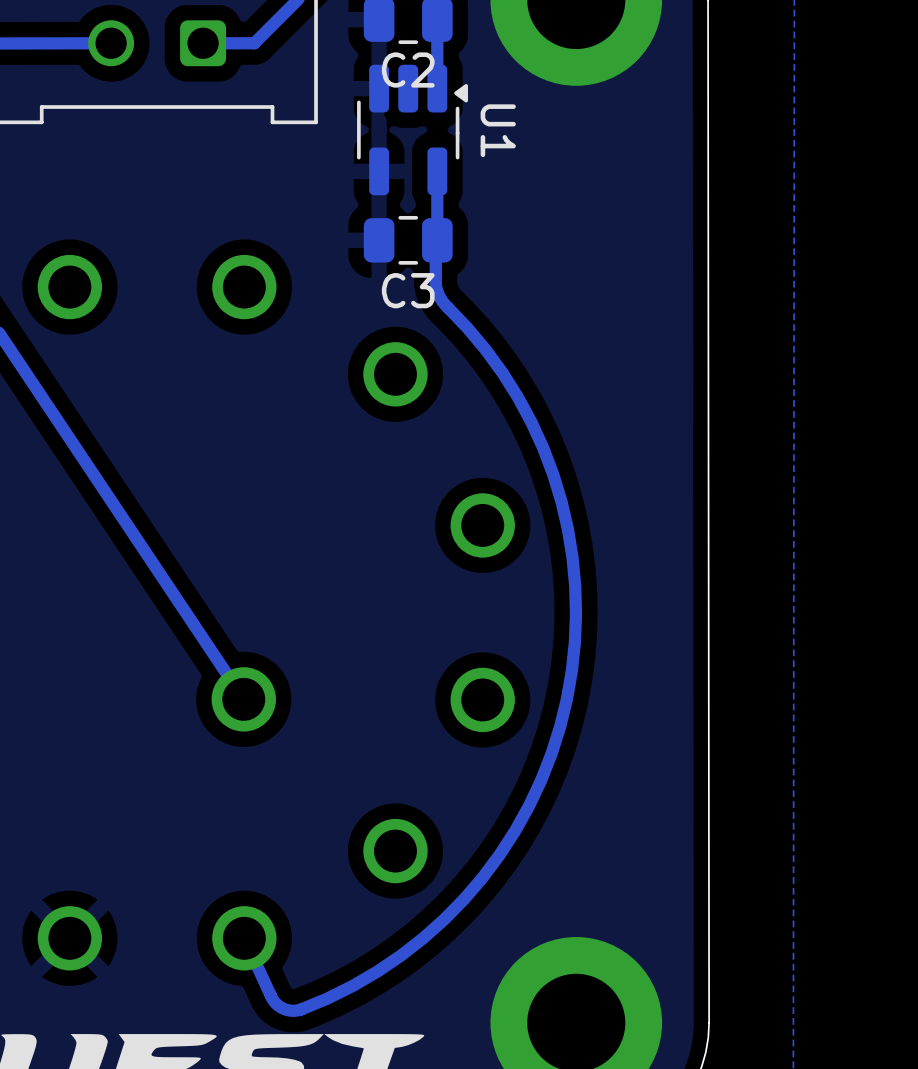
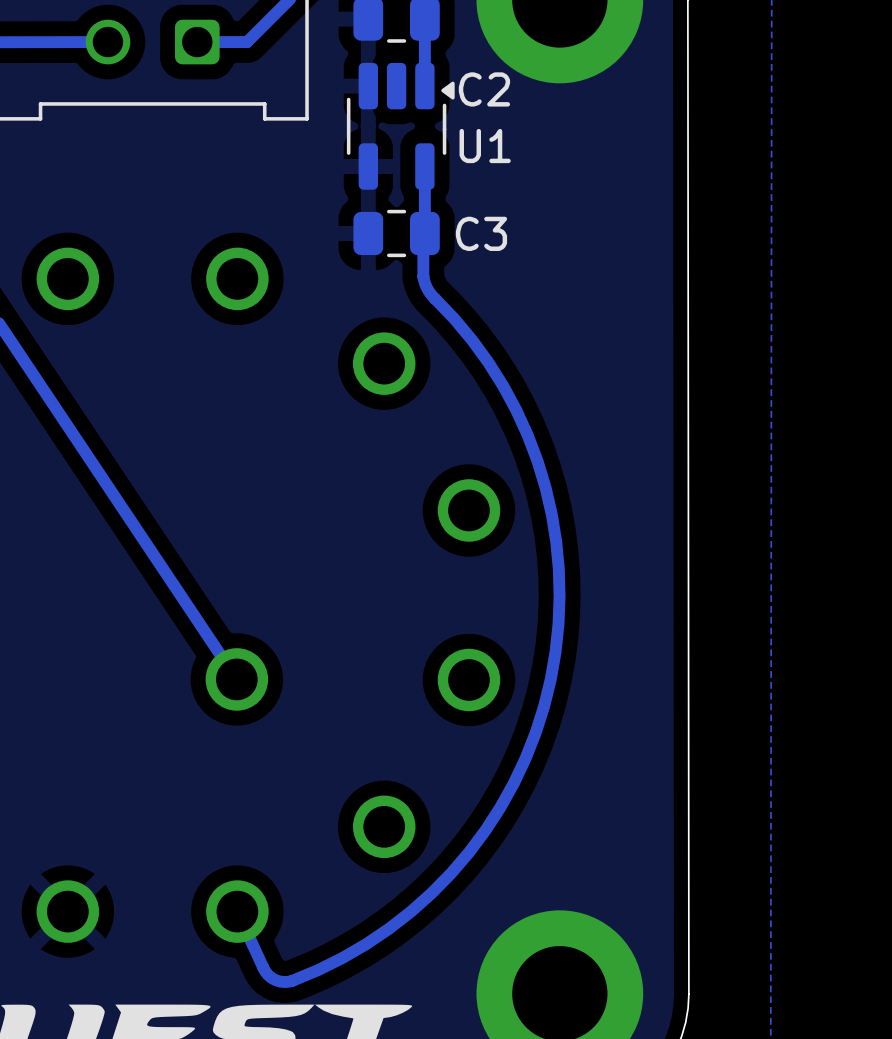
C2 name position: C2 (408, 70) -> C2 (484, 89)
U1 name rotation: 0° (498, 130) -> 90° counterclockwise (485, 146)
C3 name position: C3 (408, 290) -> C3 (481, 233)

